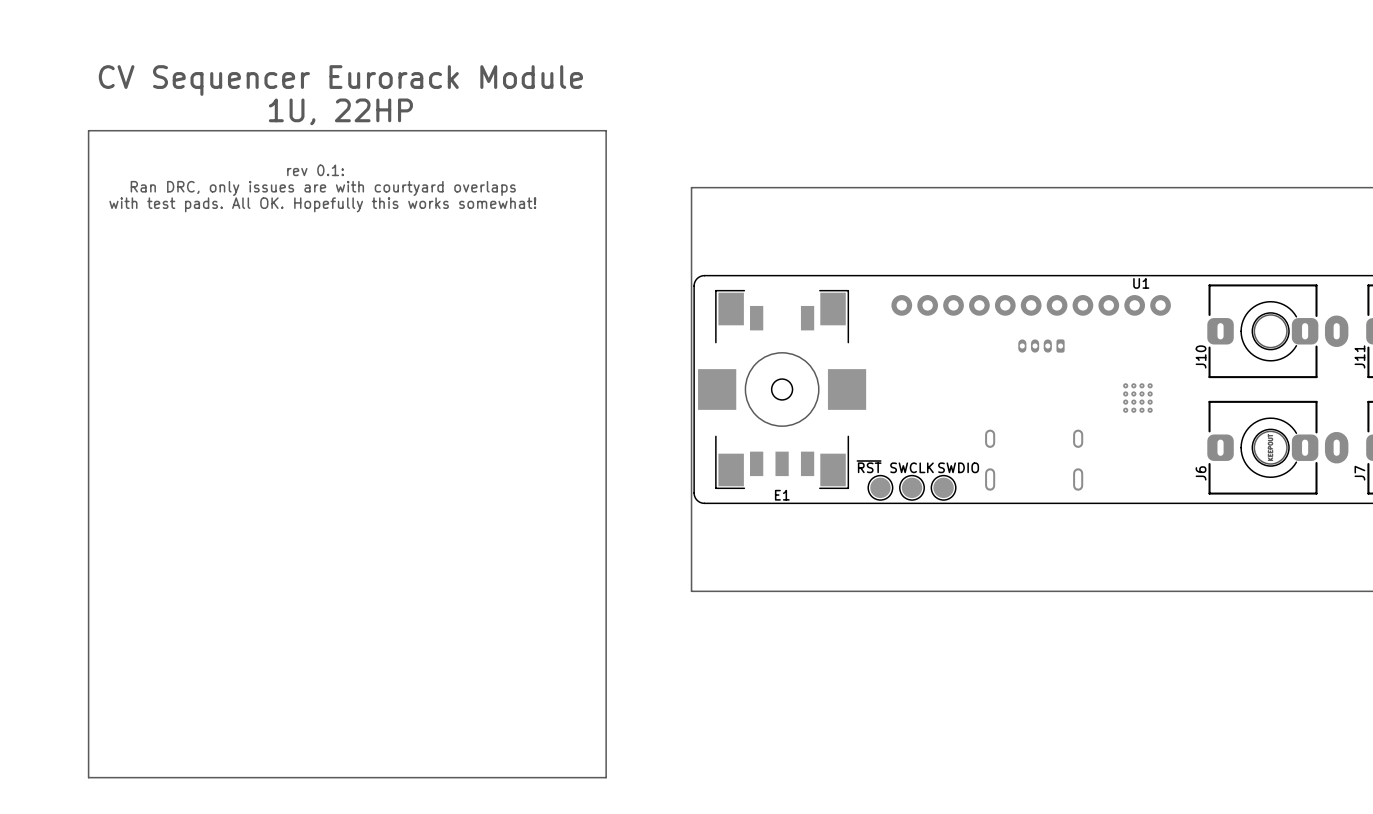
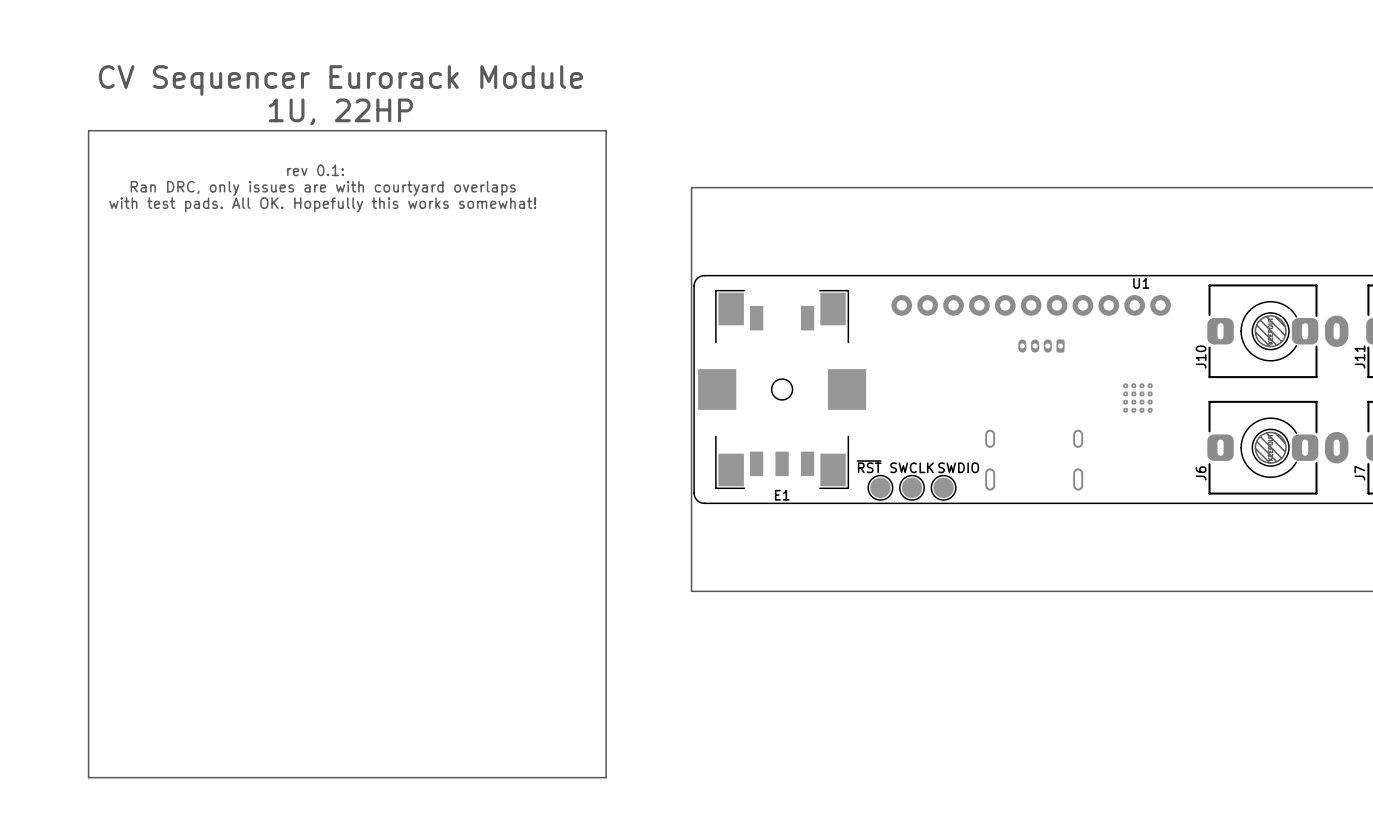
J10 footprint: [1207, 284, 1349, 379] -> [1207, 284, 1349, 379]
E1 footprint: [698, 290, 867, 489] -> [698, 290, 867, 489]
J6 footprint: [1207, 400, 1349, 495] -> [1207, 400, 1349, 495]

